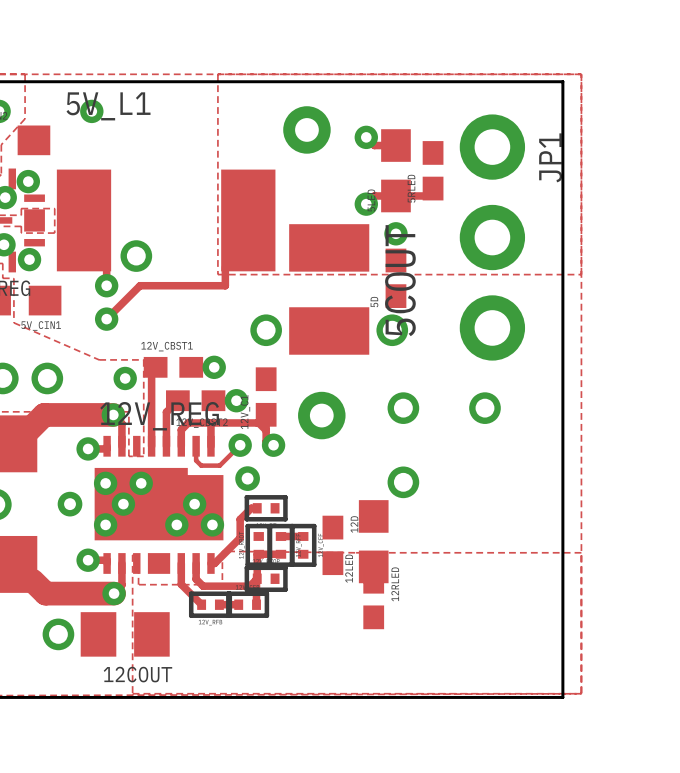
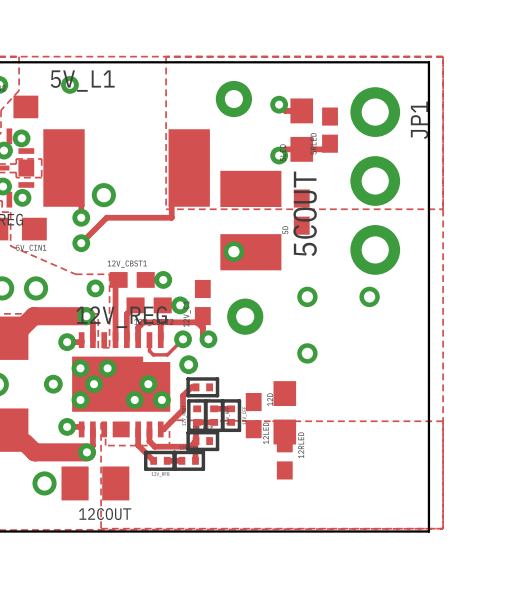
via: (395, 233) -> none
via: (266, 330) -> none
via: none -> (233, 251)
via: (392, 330) -> none
via position: (403, 408) -> (307, 296)
via position: (484, 408) -> (369, 296)
via position: (403, 482) -> (307, 353)

